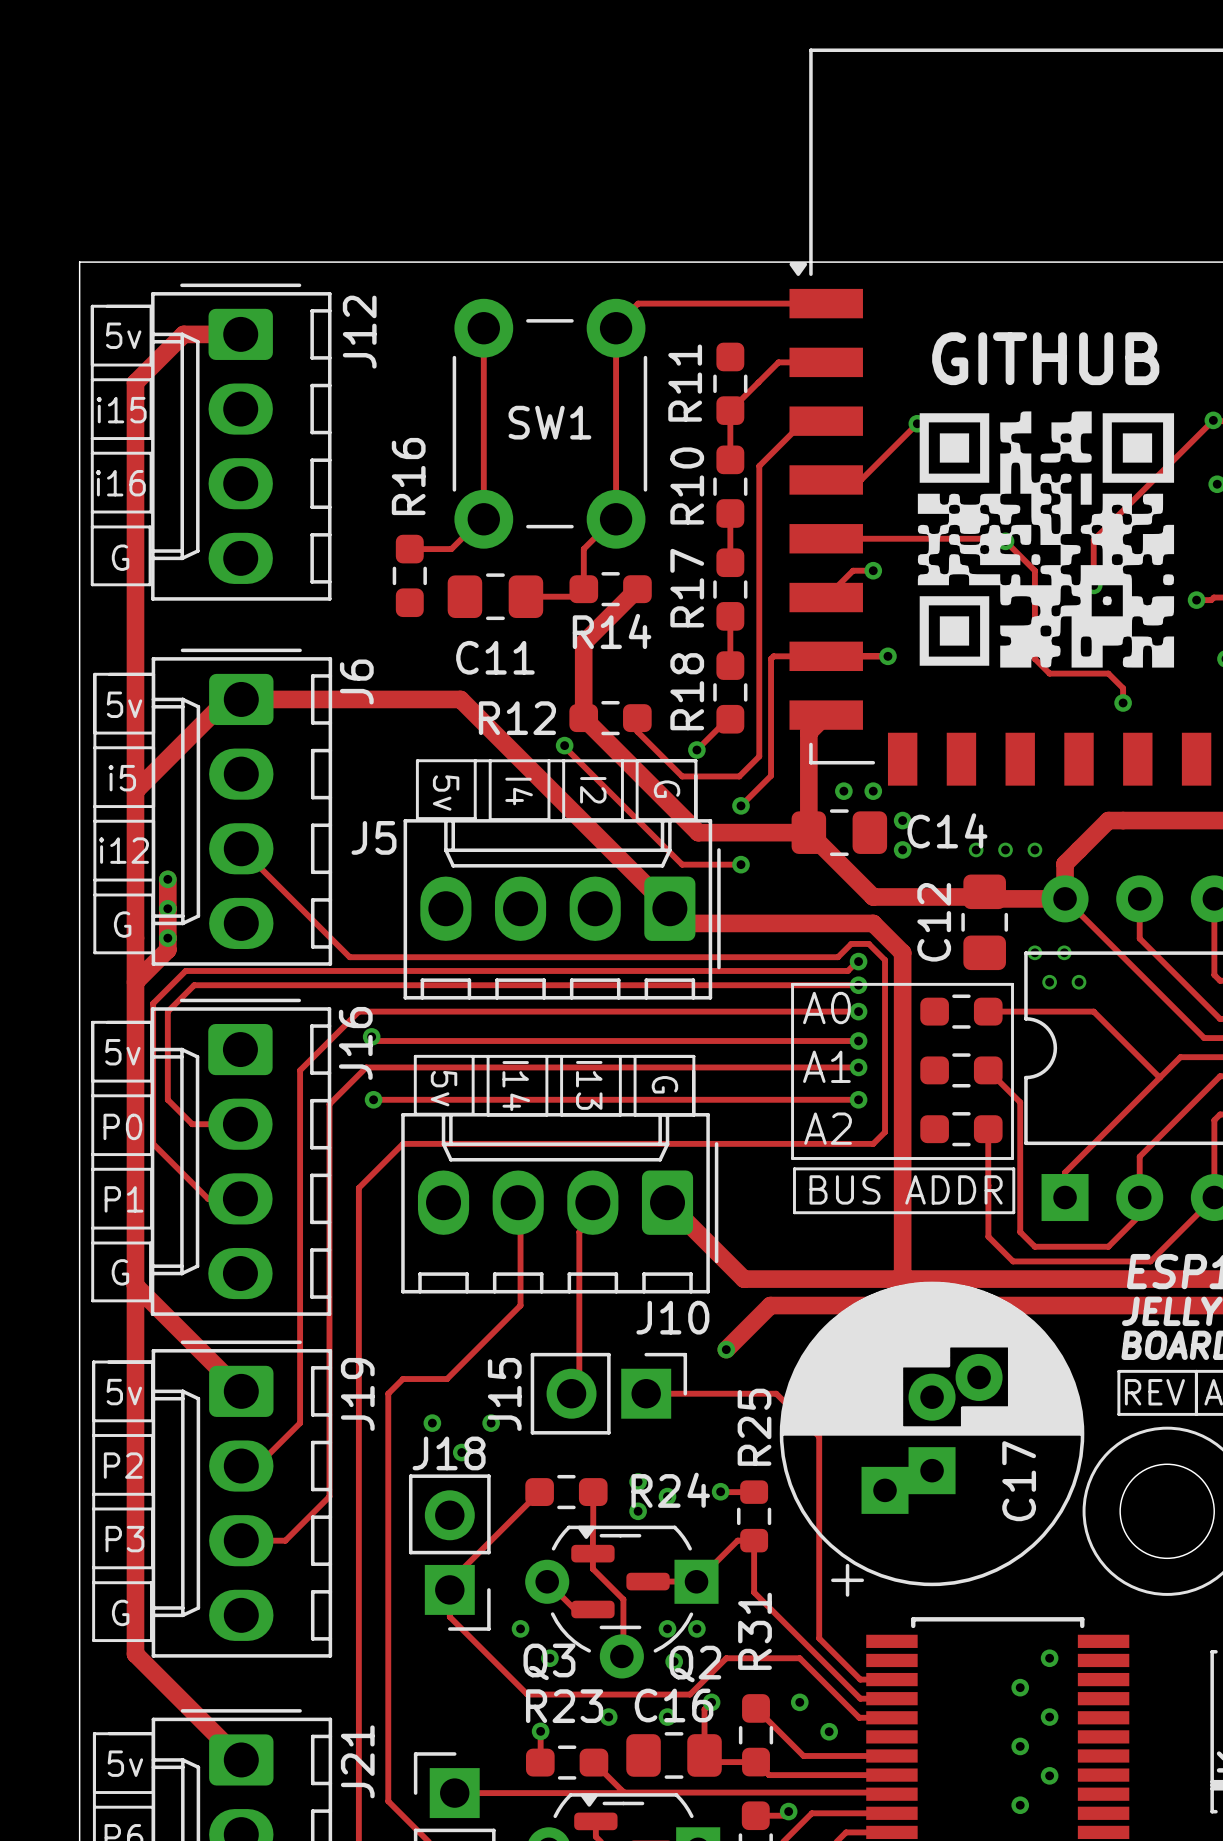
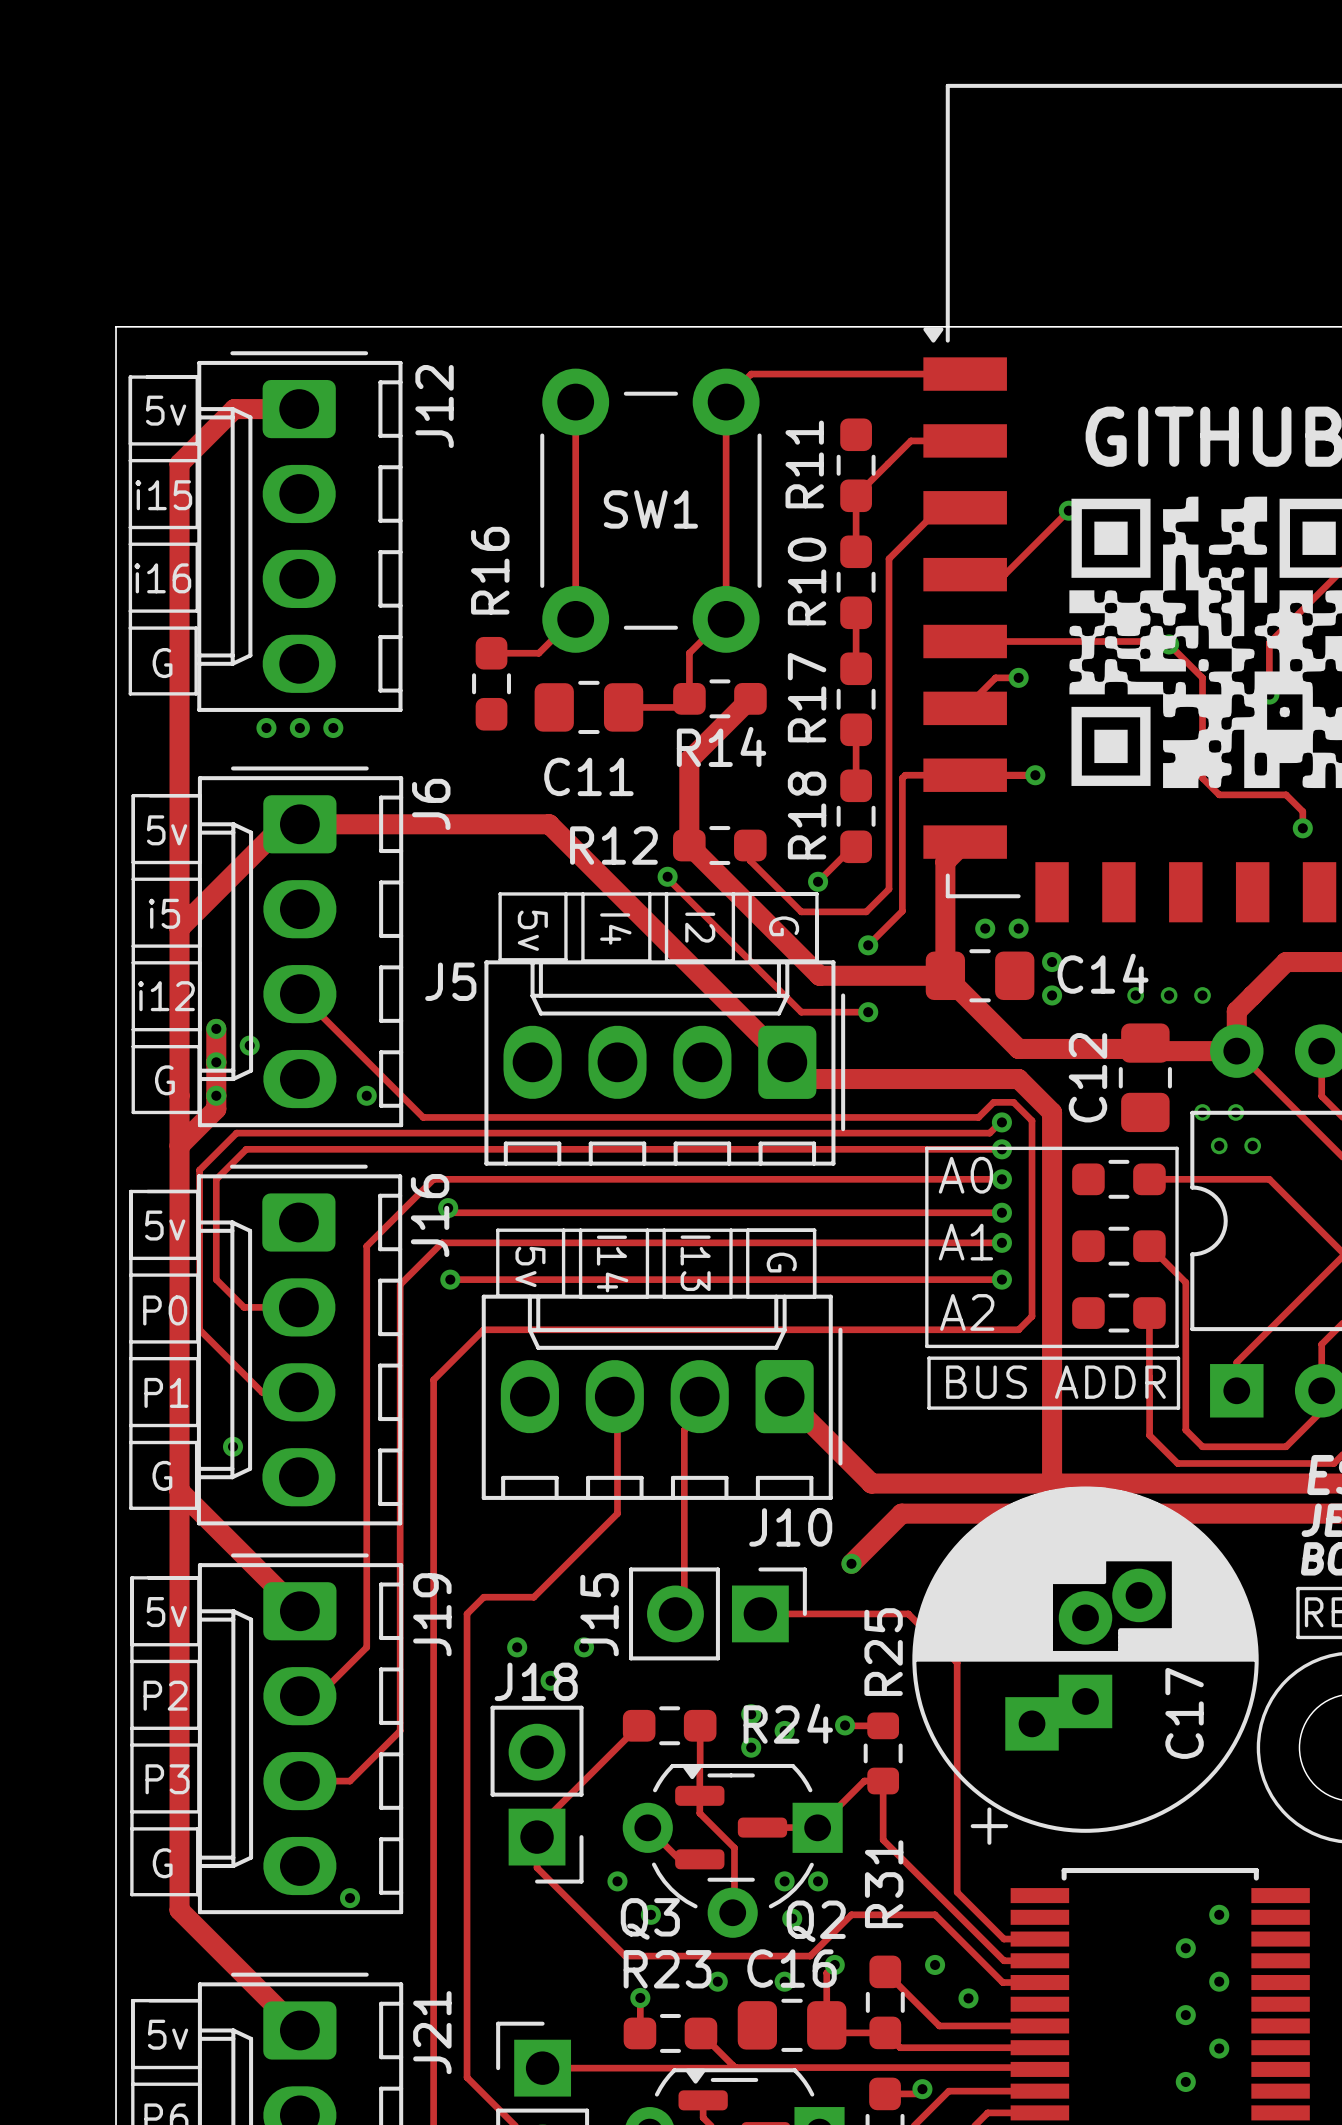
via: none -> (266, 728)
via: none -> (299, 728)
via: none -> (333, 728)
via: none -> (249, 1045)
via: none -> (366, 1095)
via: none -> (233, 1446)
via: none -> (350, 1898)

